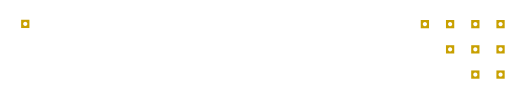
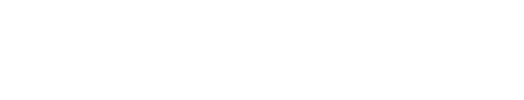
part: (25, 23) -> none
part: (424, 24) -> none
part: (450, 24) -> none
part: (475, 24) -> none
part: (500, 24) -> none
part: (450, 49) -> none
part: (475, 49) -> none
part: (500, 49) -> none
part: (475, 74) -> none
part: (500, 74) -> none

